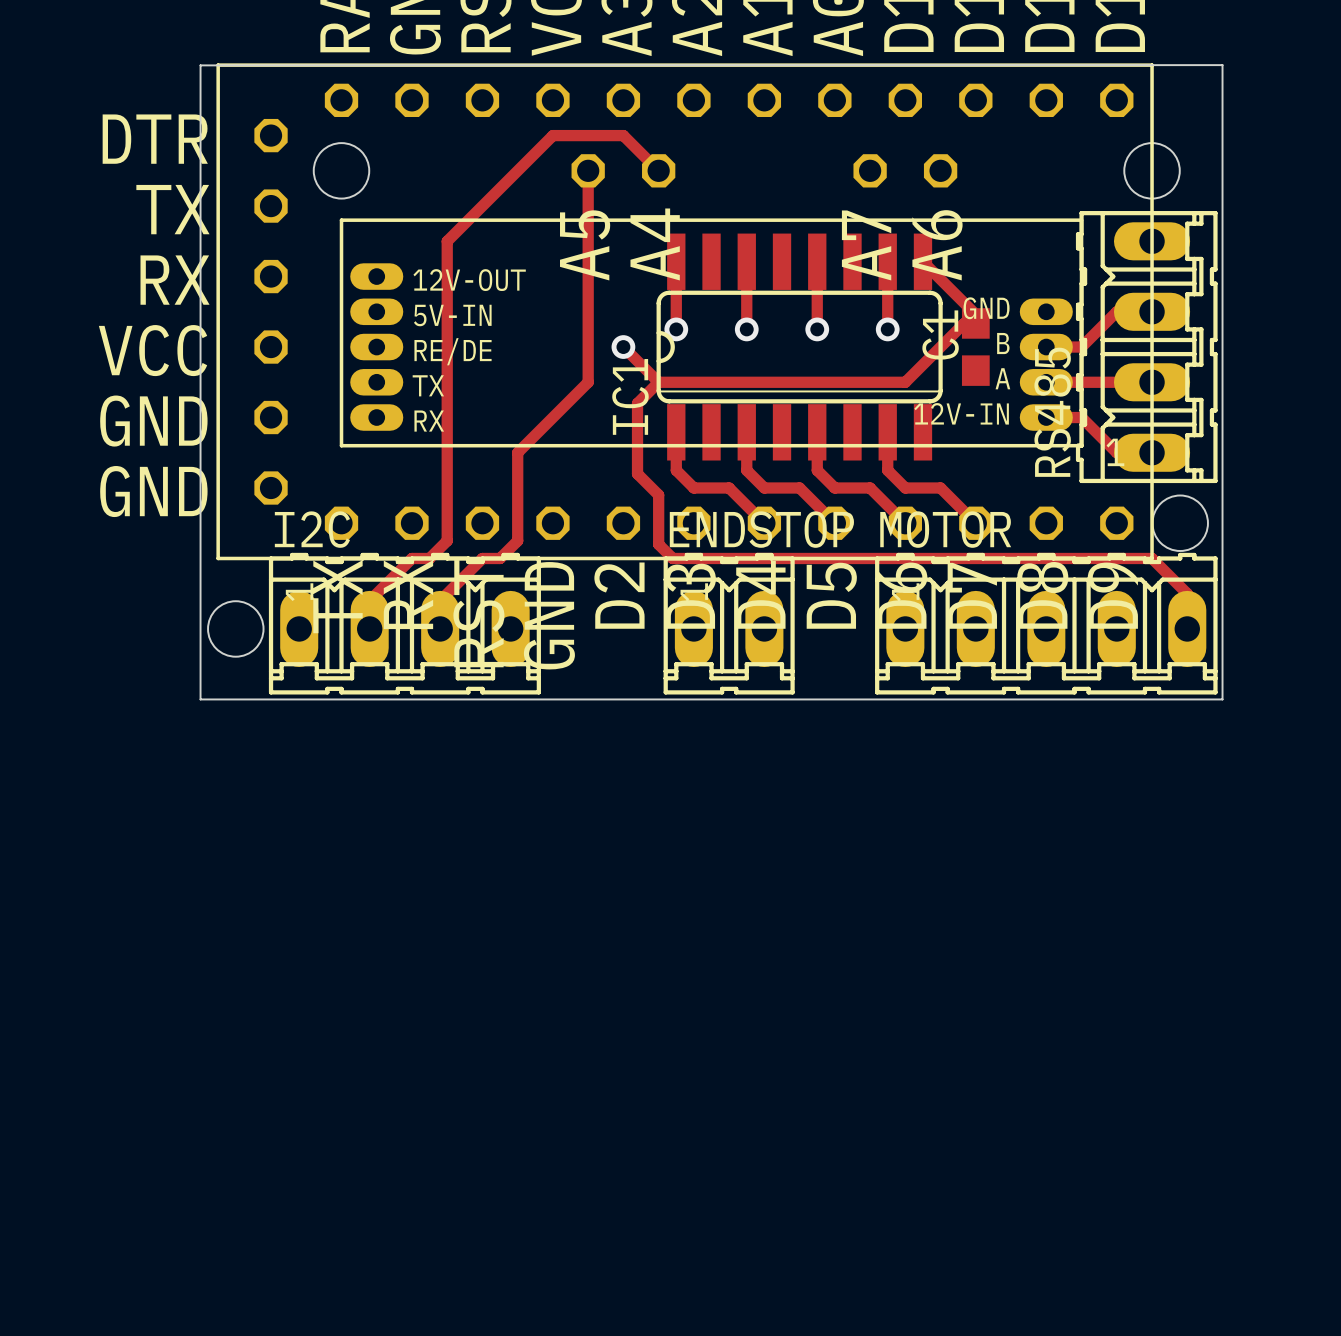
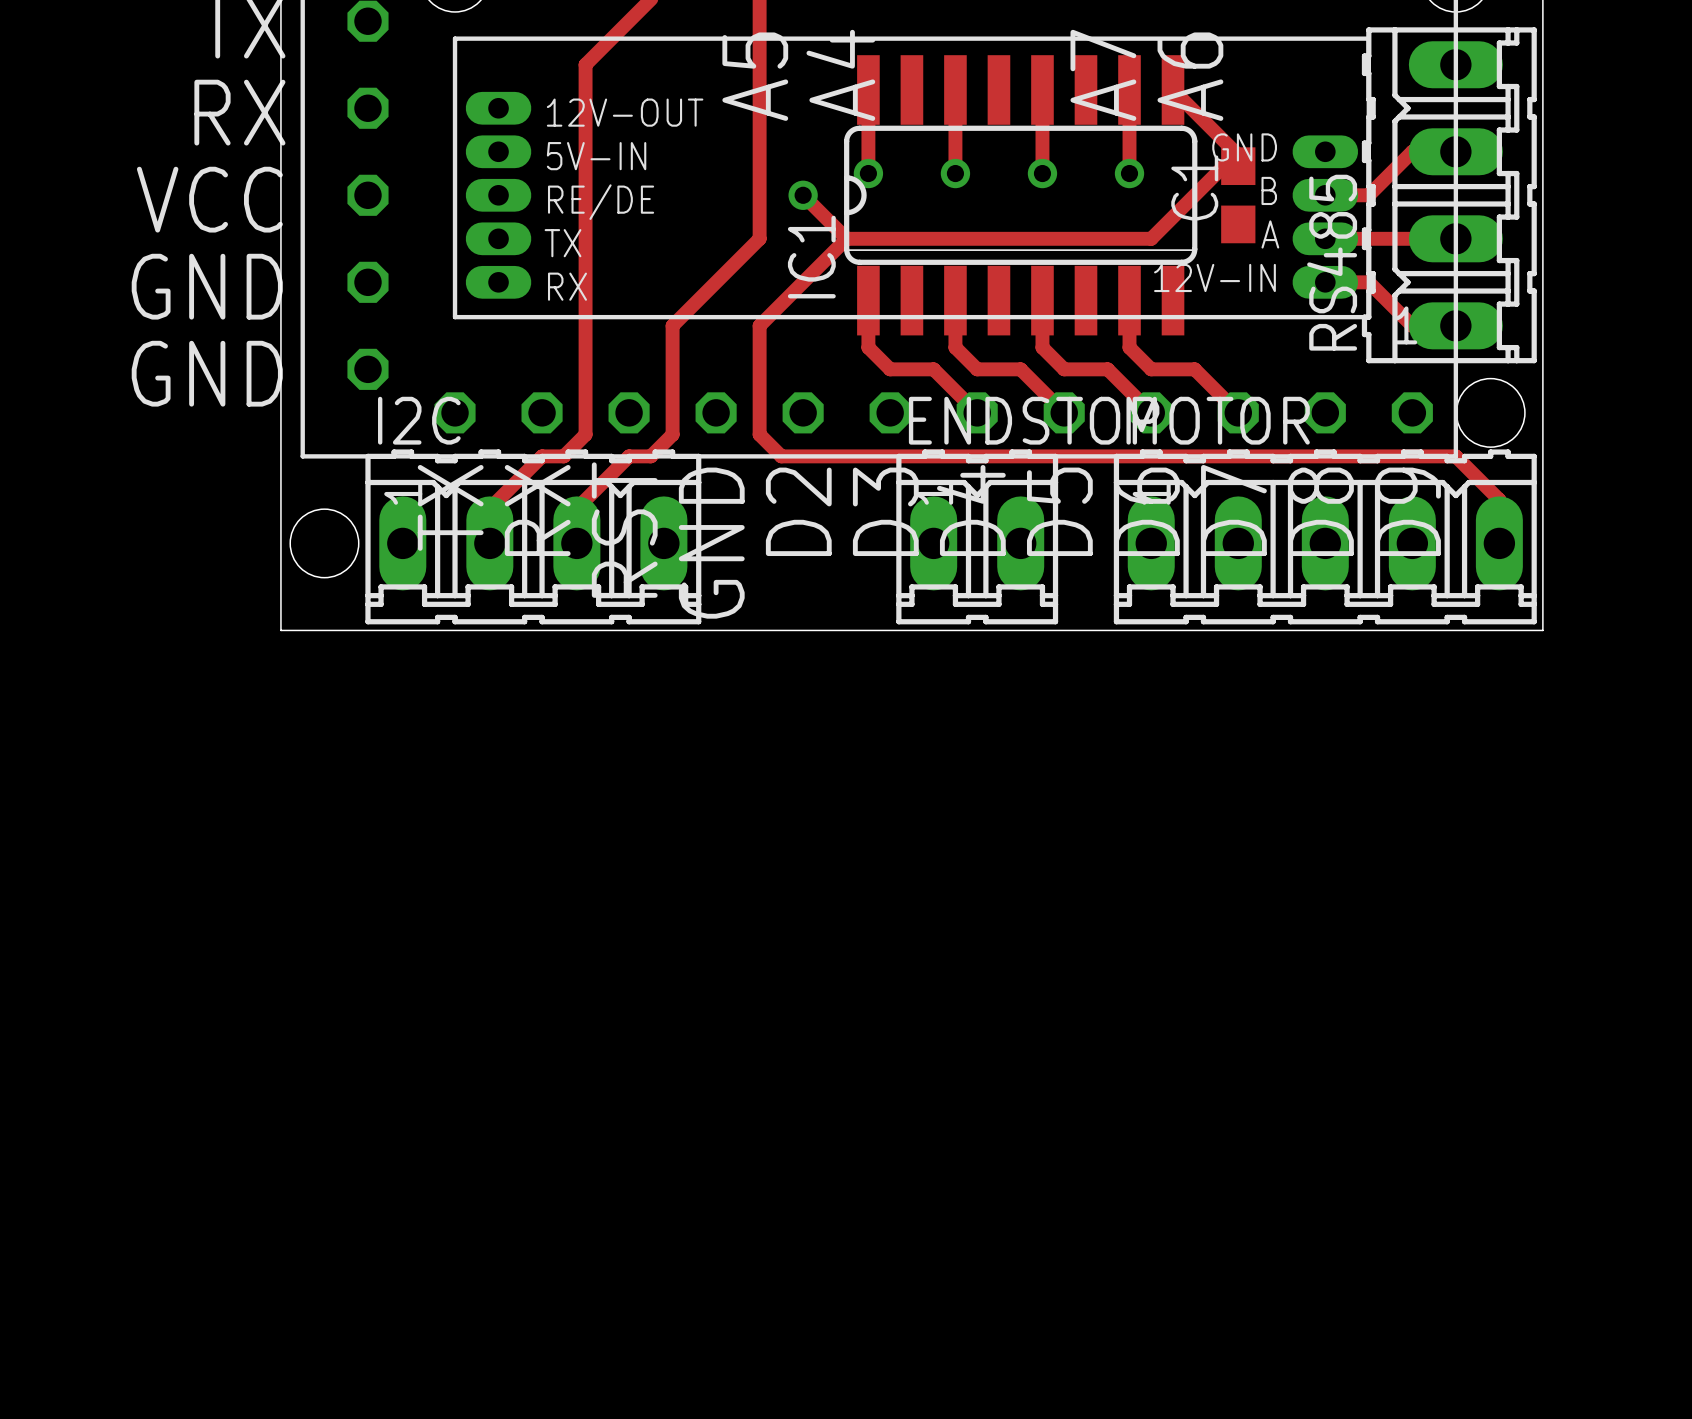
track: (637, 403) (637, 473) (658, 495) (658, 544) (672, 558) -> (820, 264) (759, 325) (759, 434) (781, 456) (864, 456)
ENDSTOP position: (729, 623) -> (977, 536)

